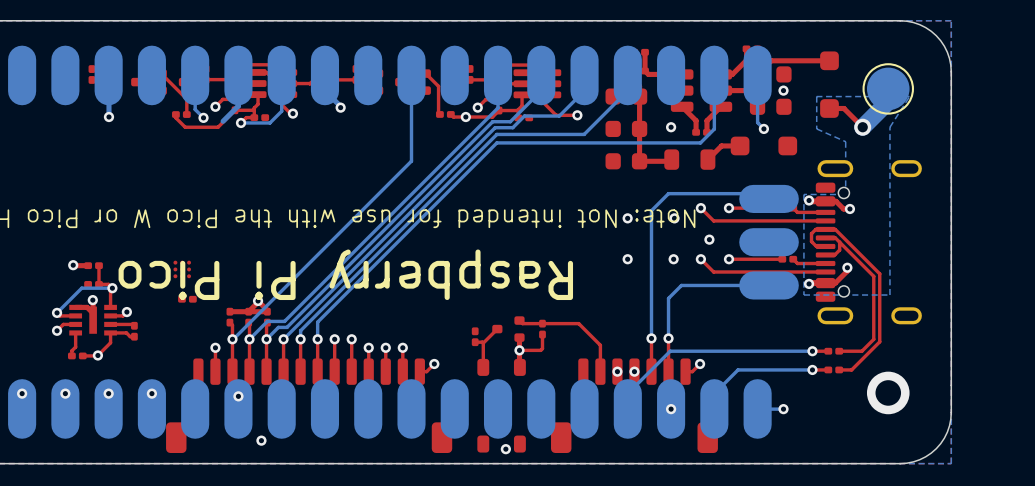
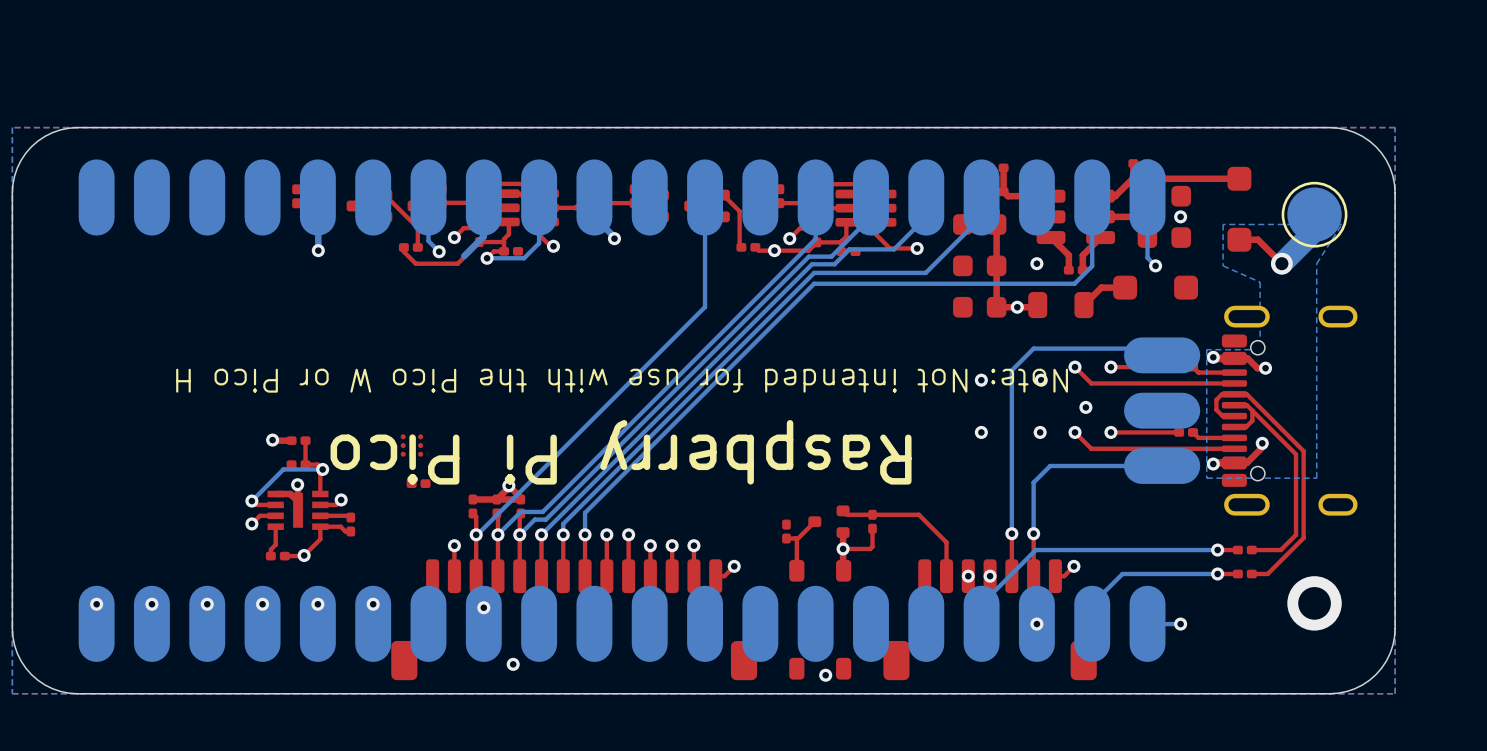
via: none -> (1017, 307)

